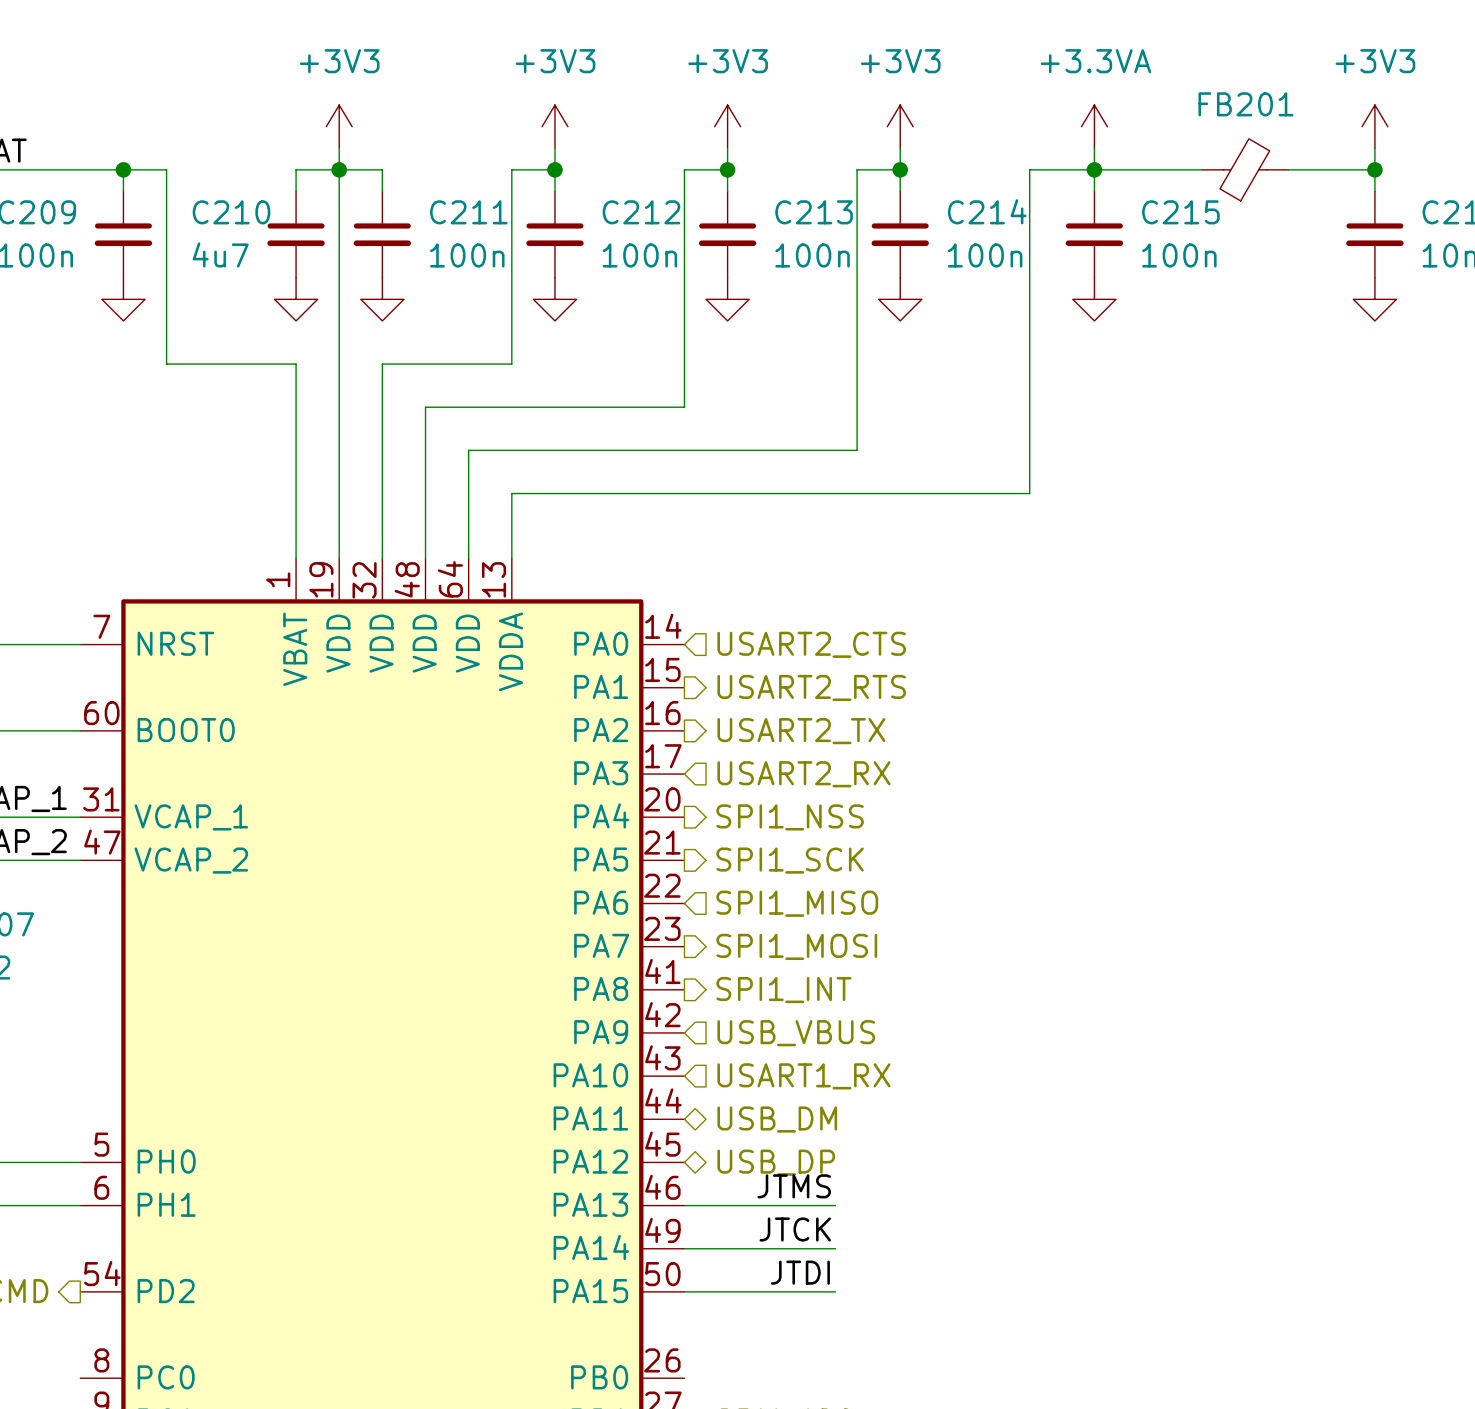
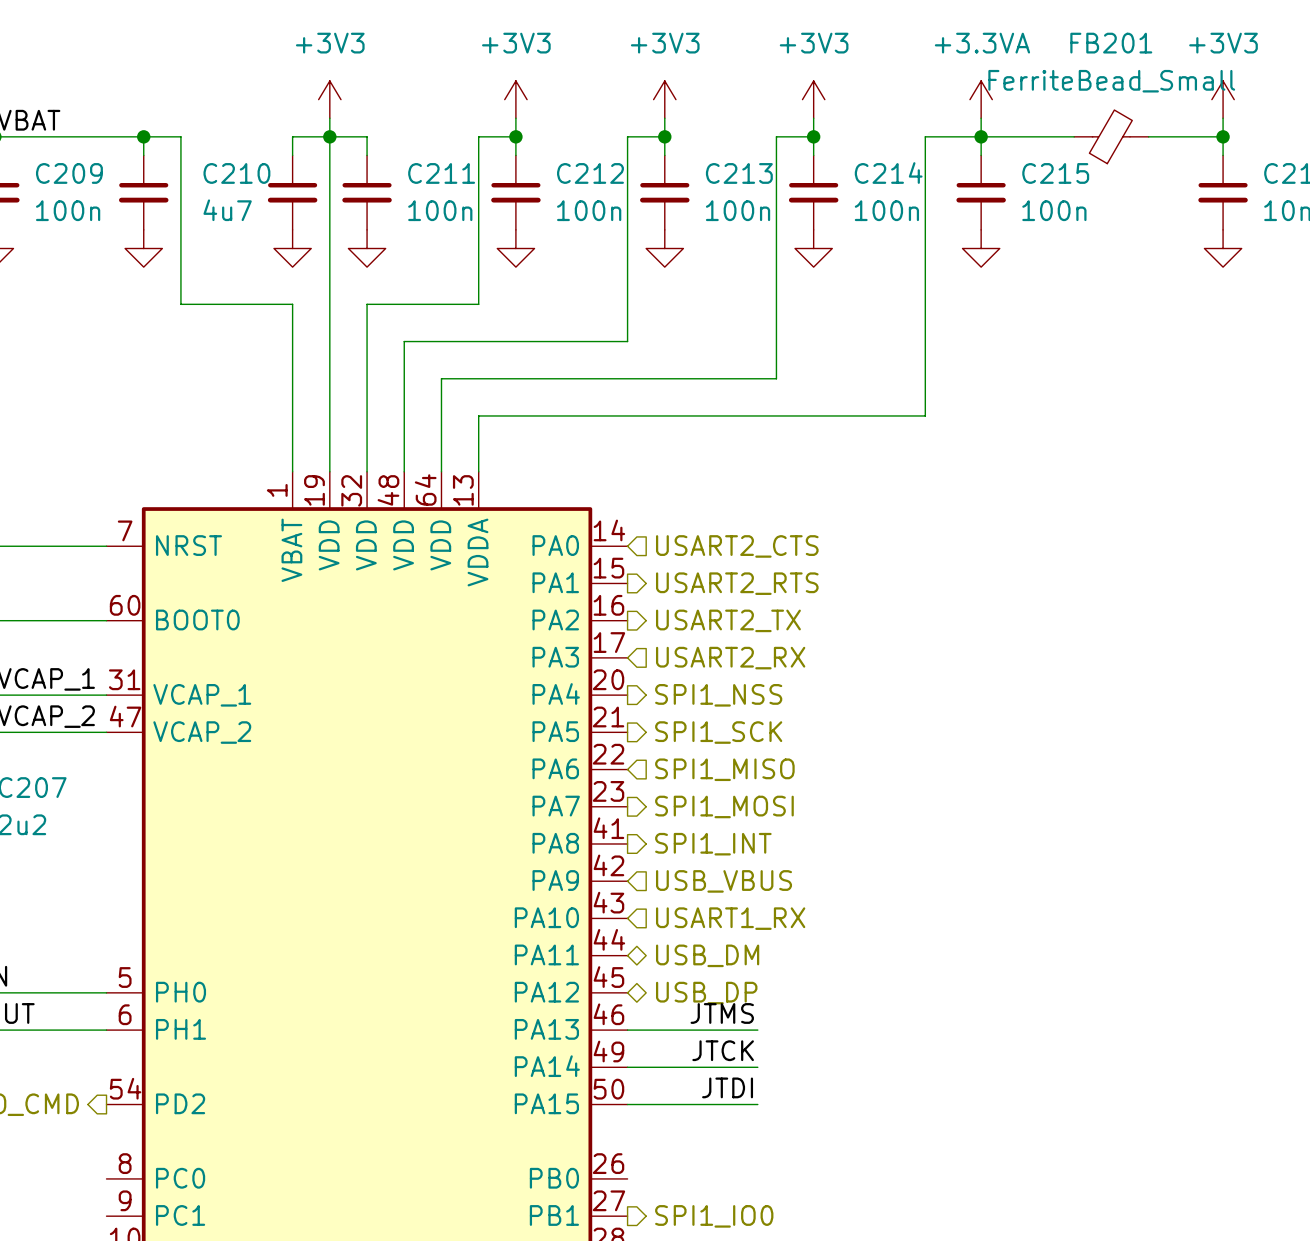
FB201 name position: FB201 (1245, 104) -> FB201 (1111, 43)
FB201 value: none -> FerriteBead_Small (1111, 81)

